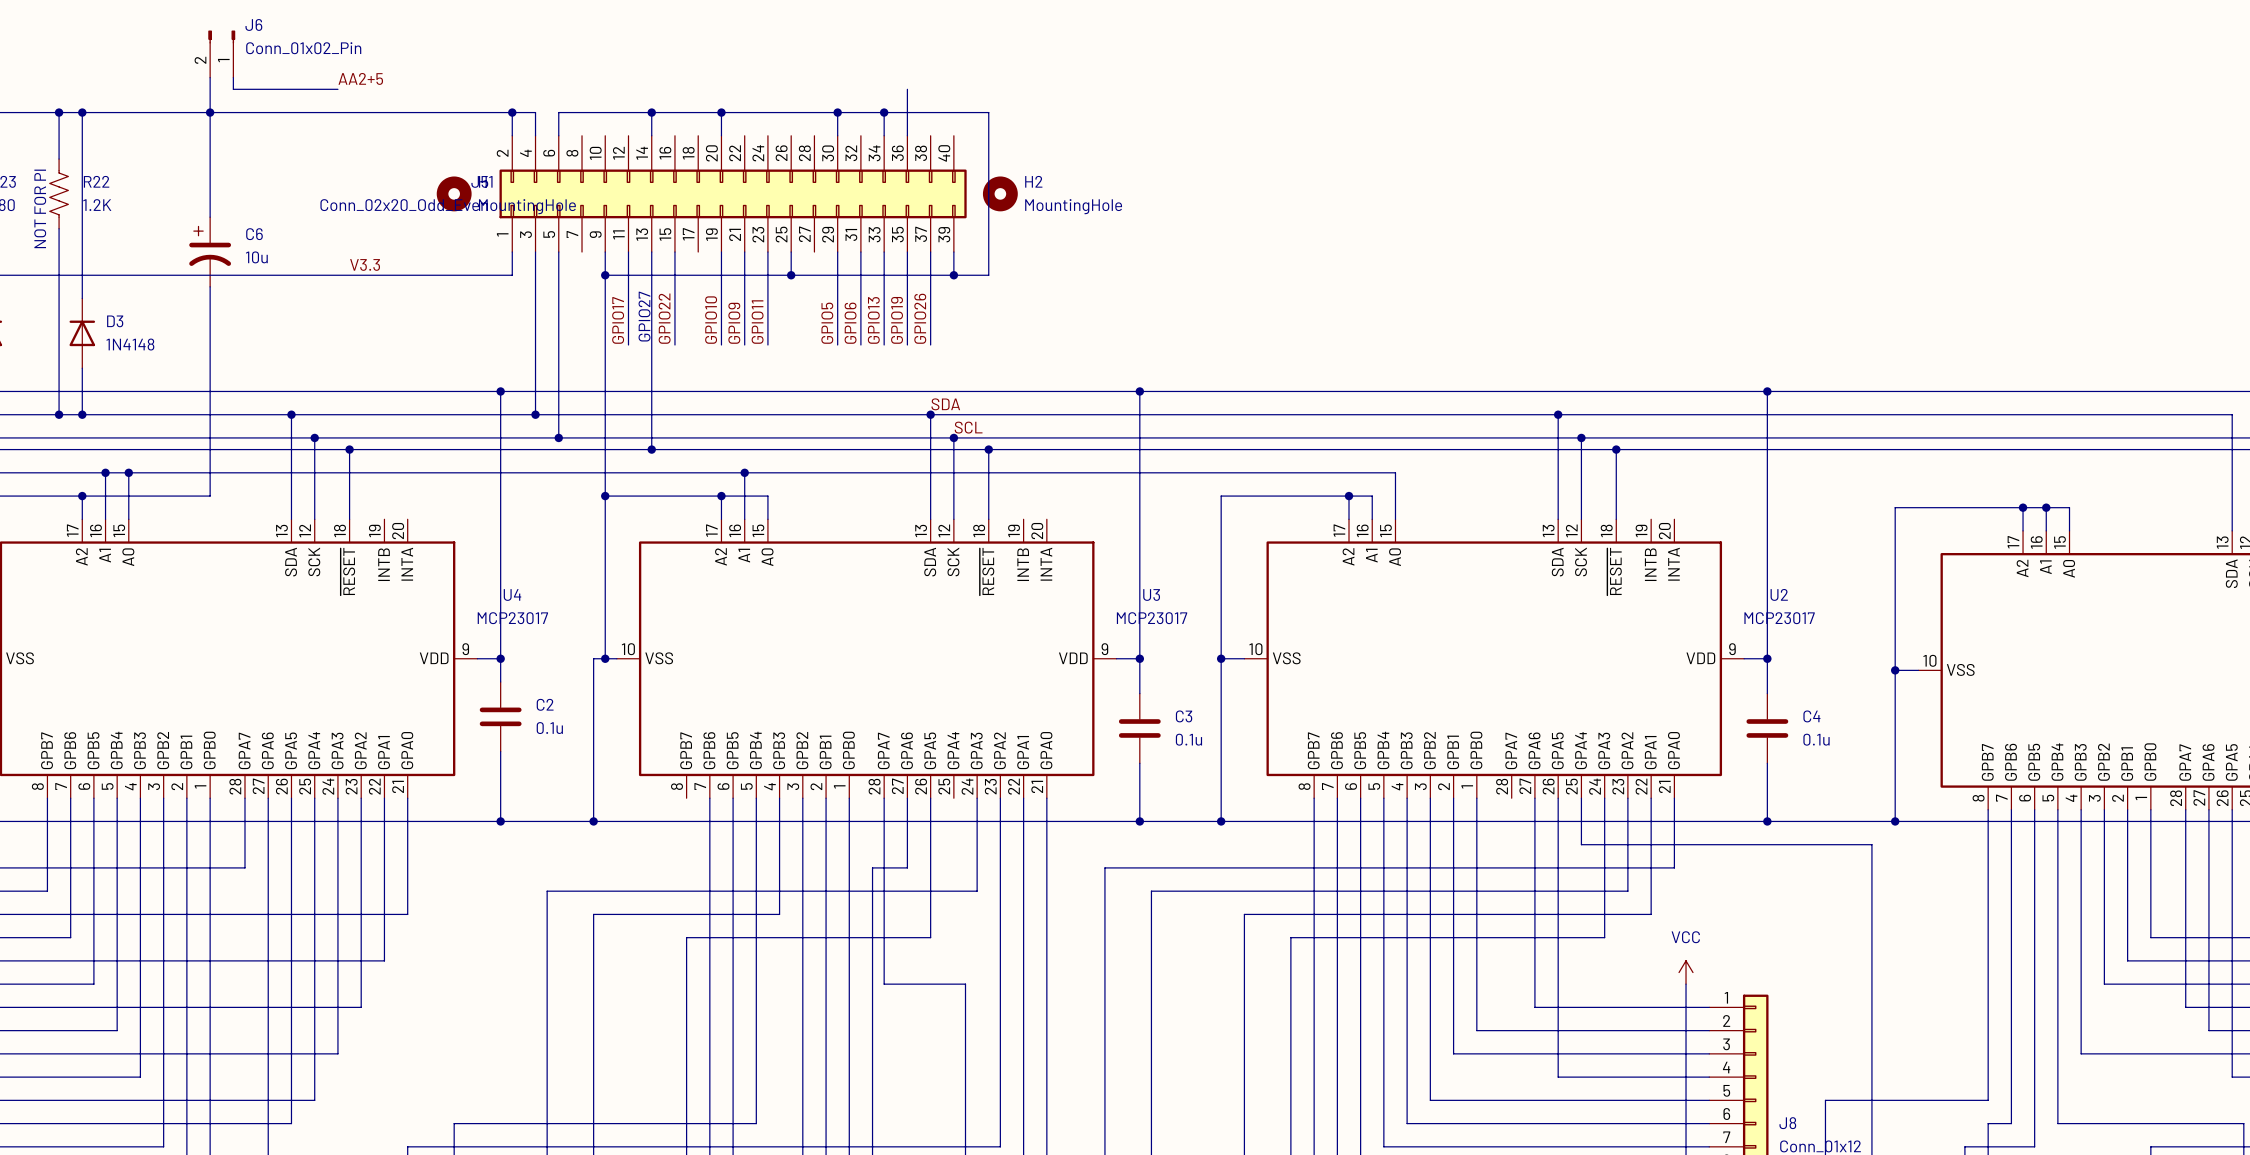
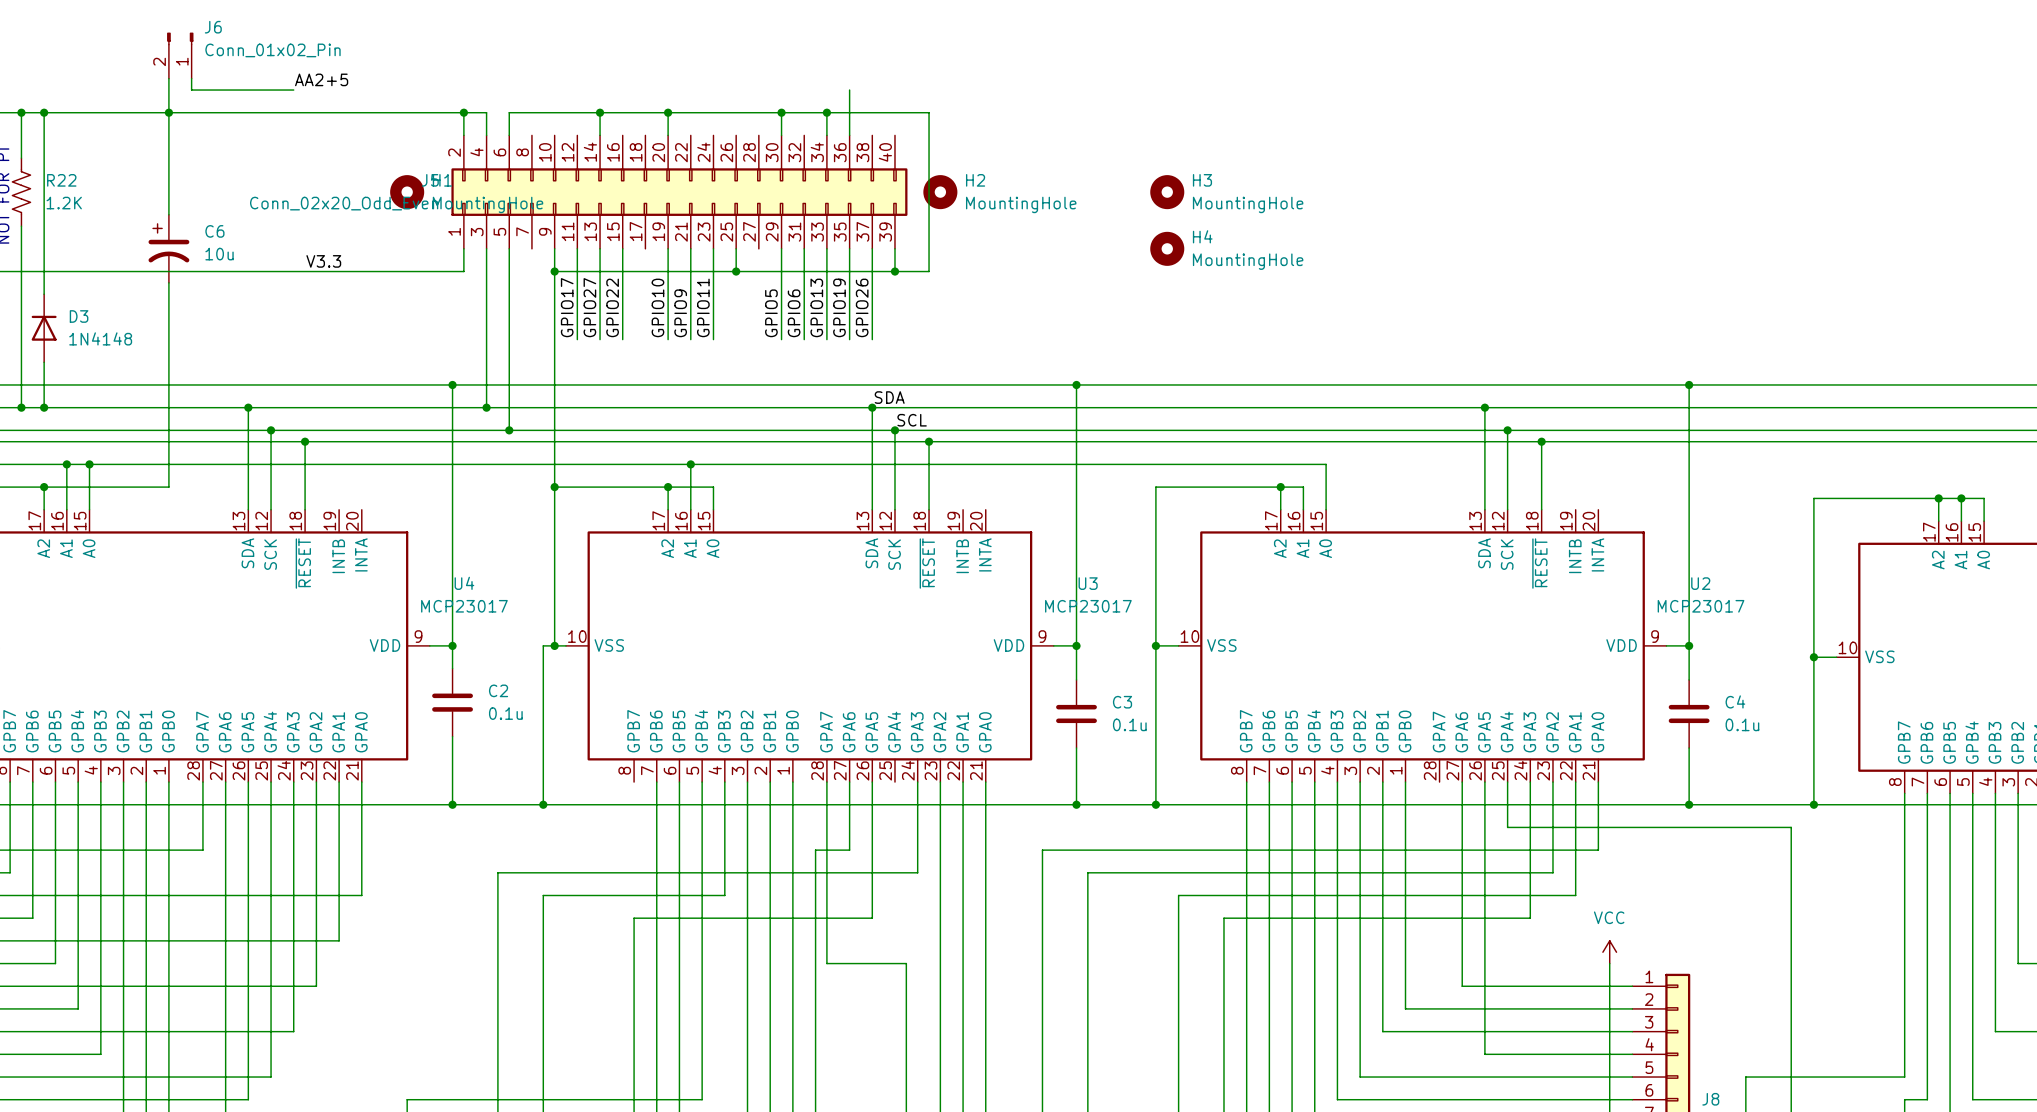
H3: none -> MountingHole (1167, 192)
H4: none -> MountingHole (1167, 248)
text: GPIO27 (644, 316) -> none
label: none -> GPIO27 (589, 307)
wire: (651, 344) (651, 449) -> none
junction: (651, 449) -> none

